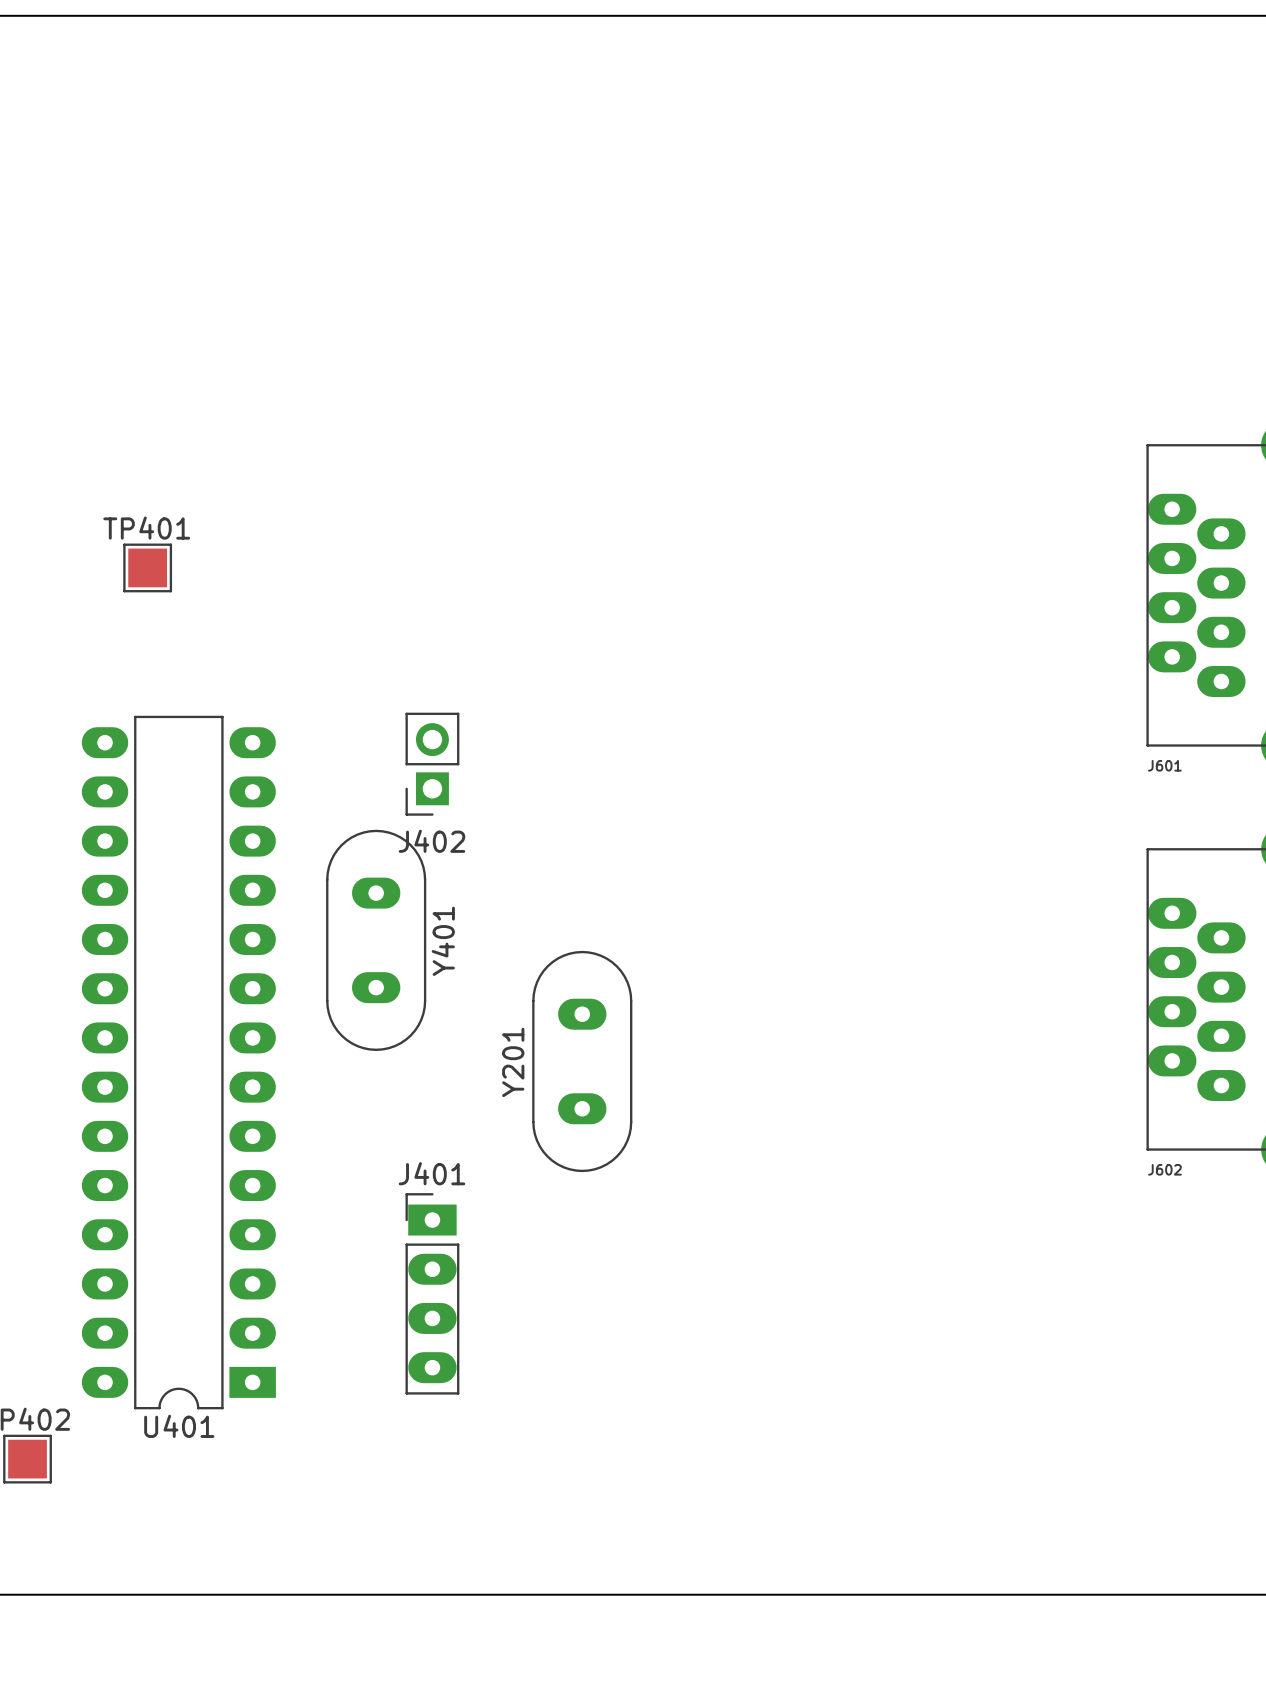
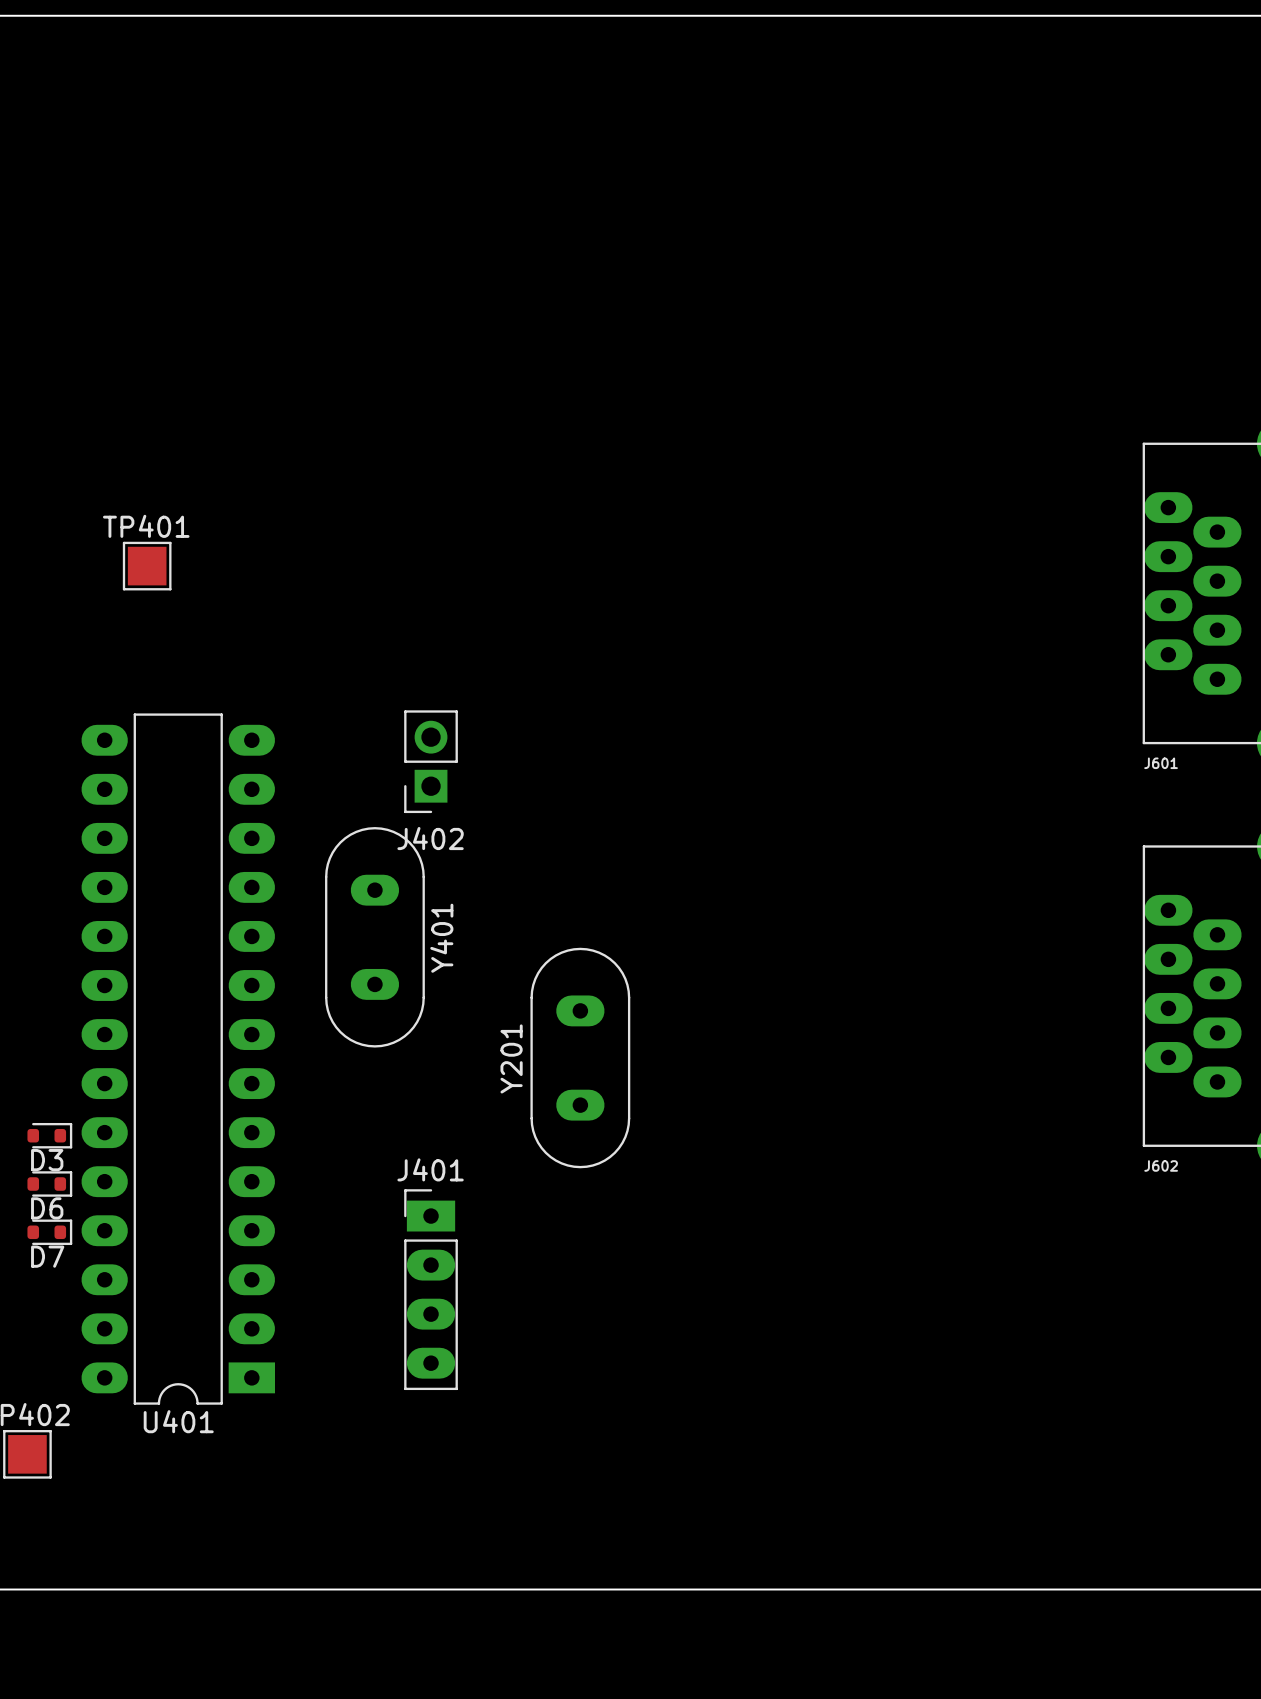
D3: none -> (49, 1135)
D6: none -> (49, 1184)
D7: none -> (49, 1232)

